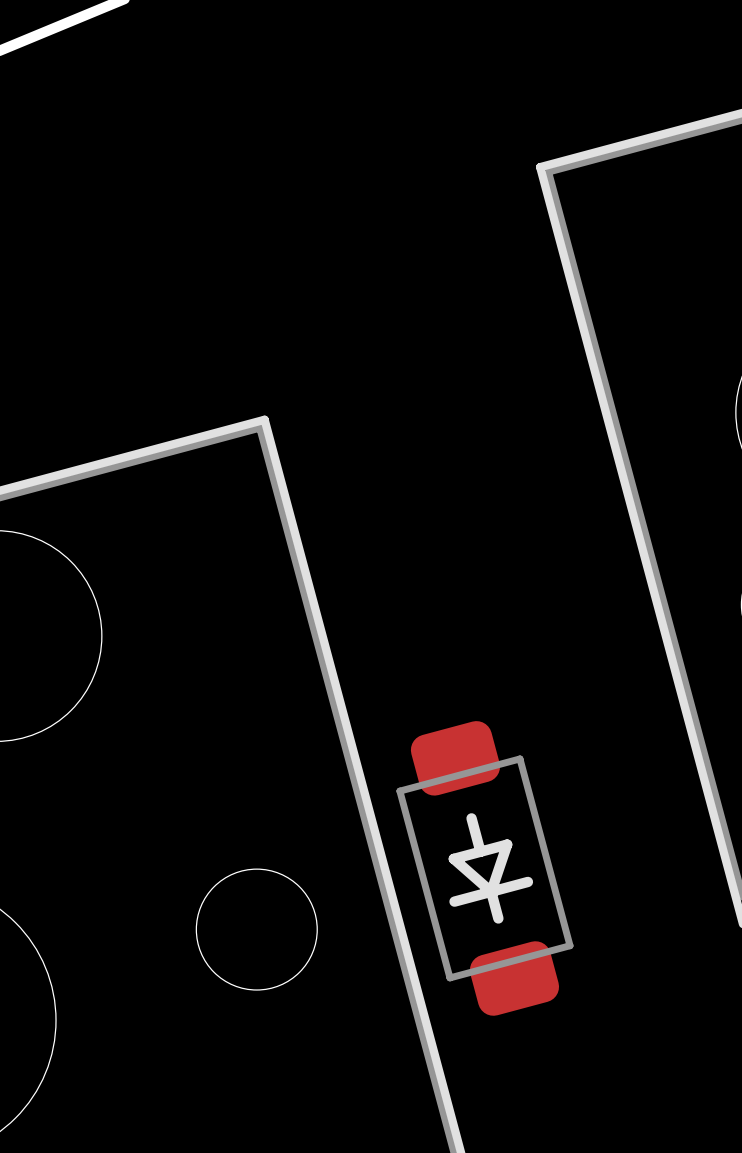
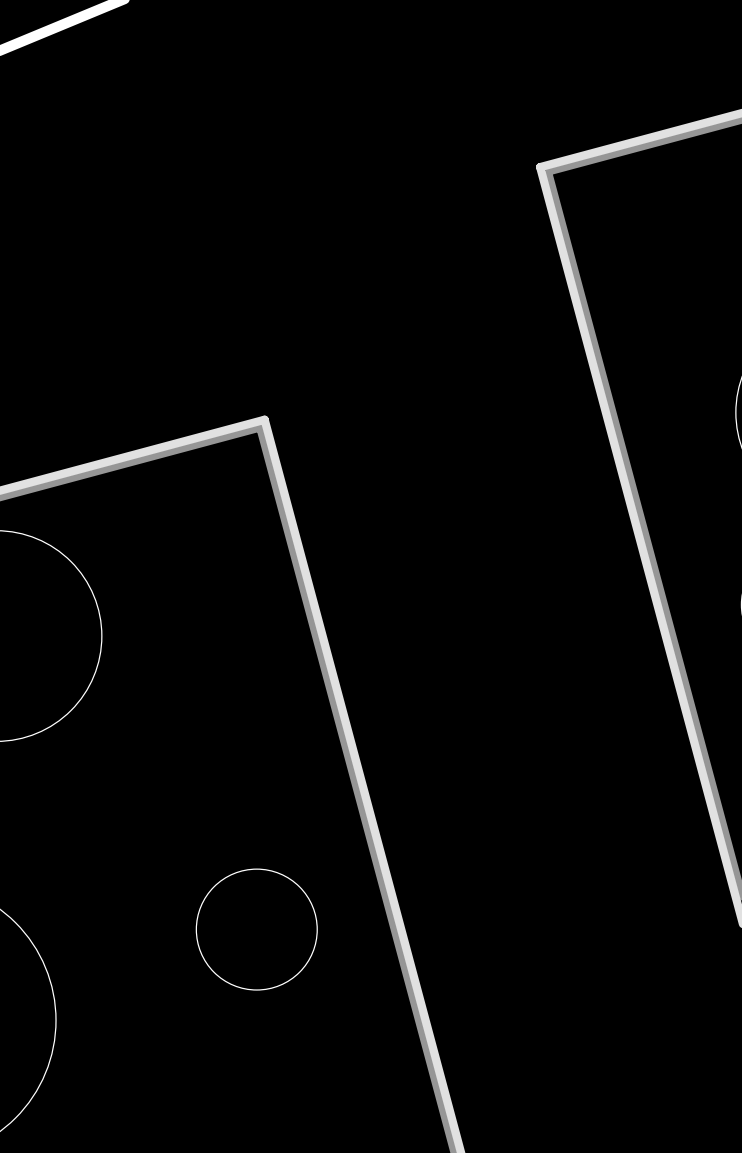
part: (484, 868) -> none

